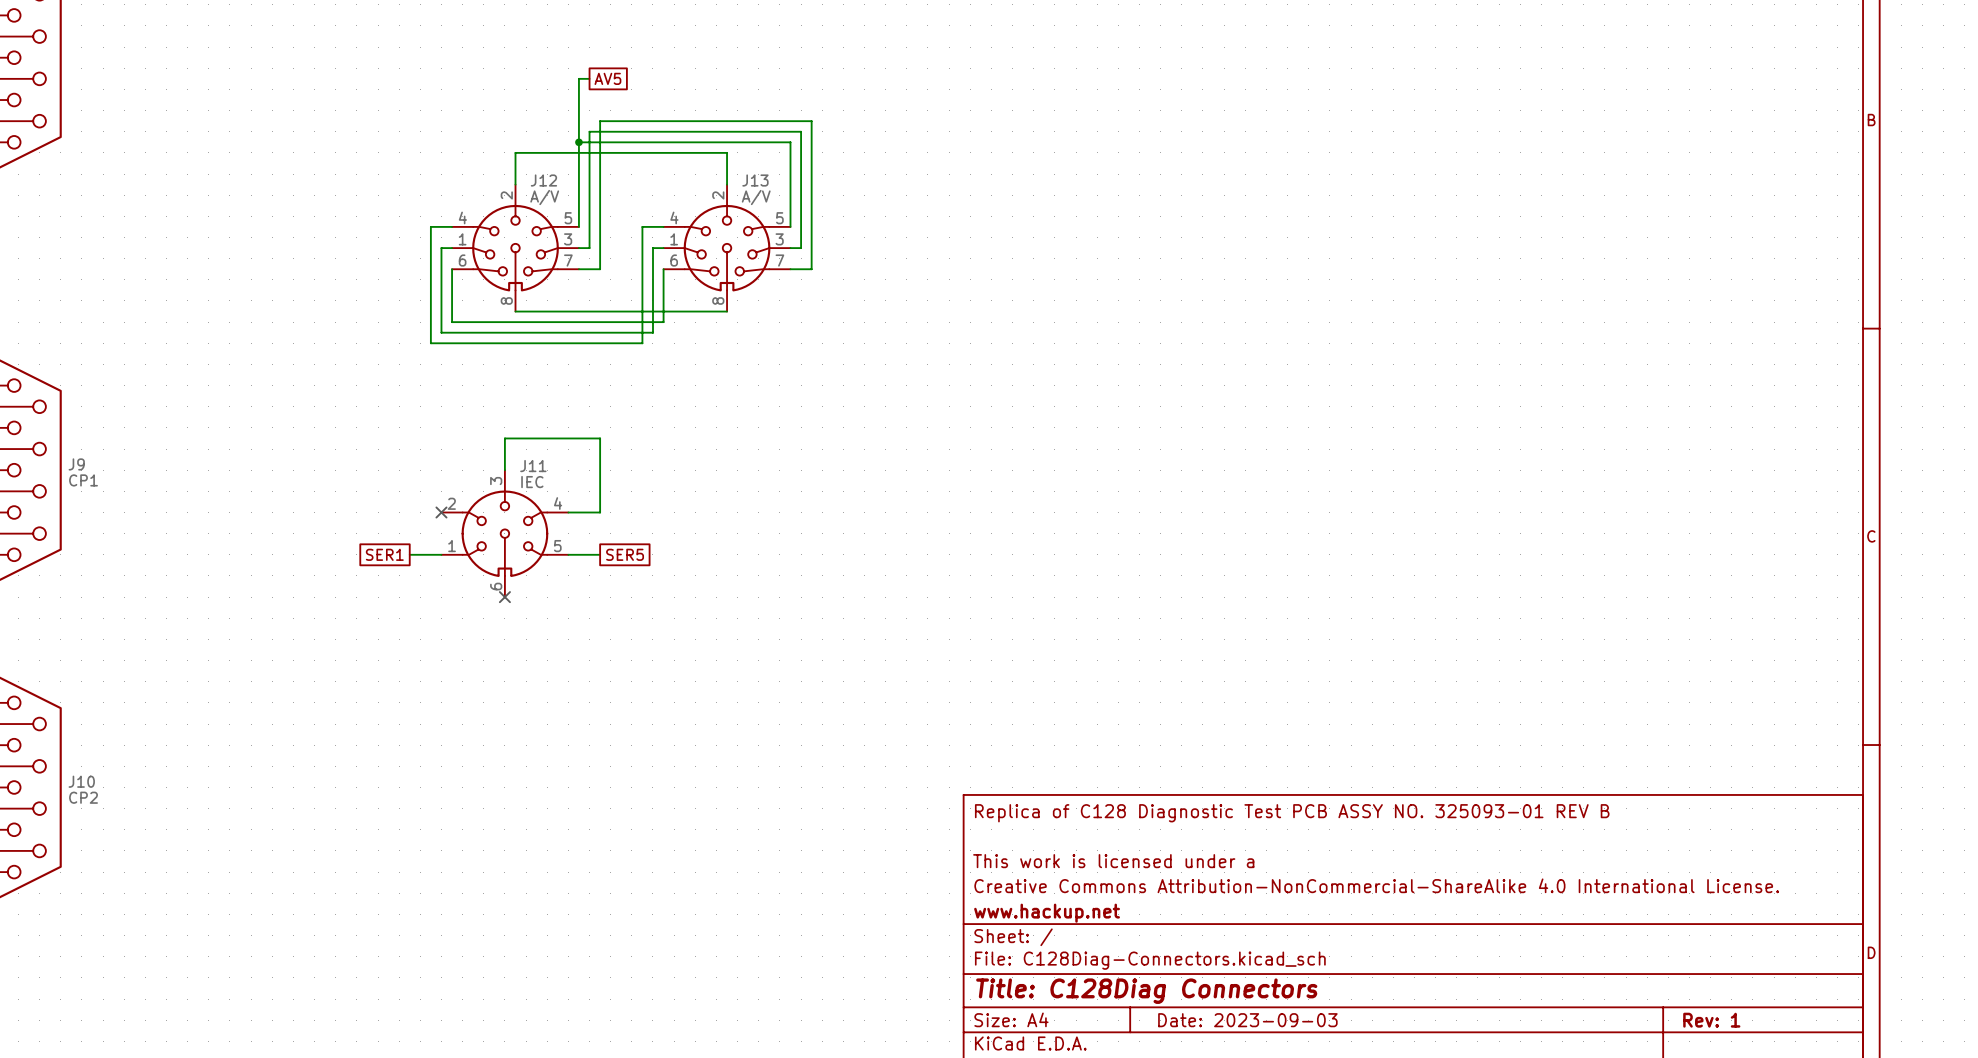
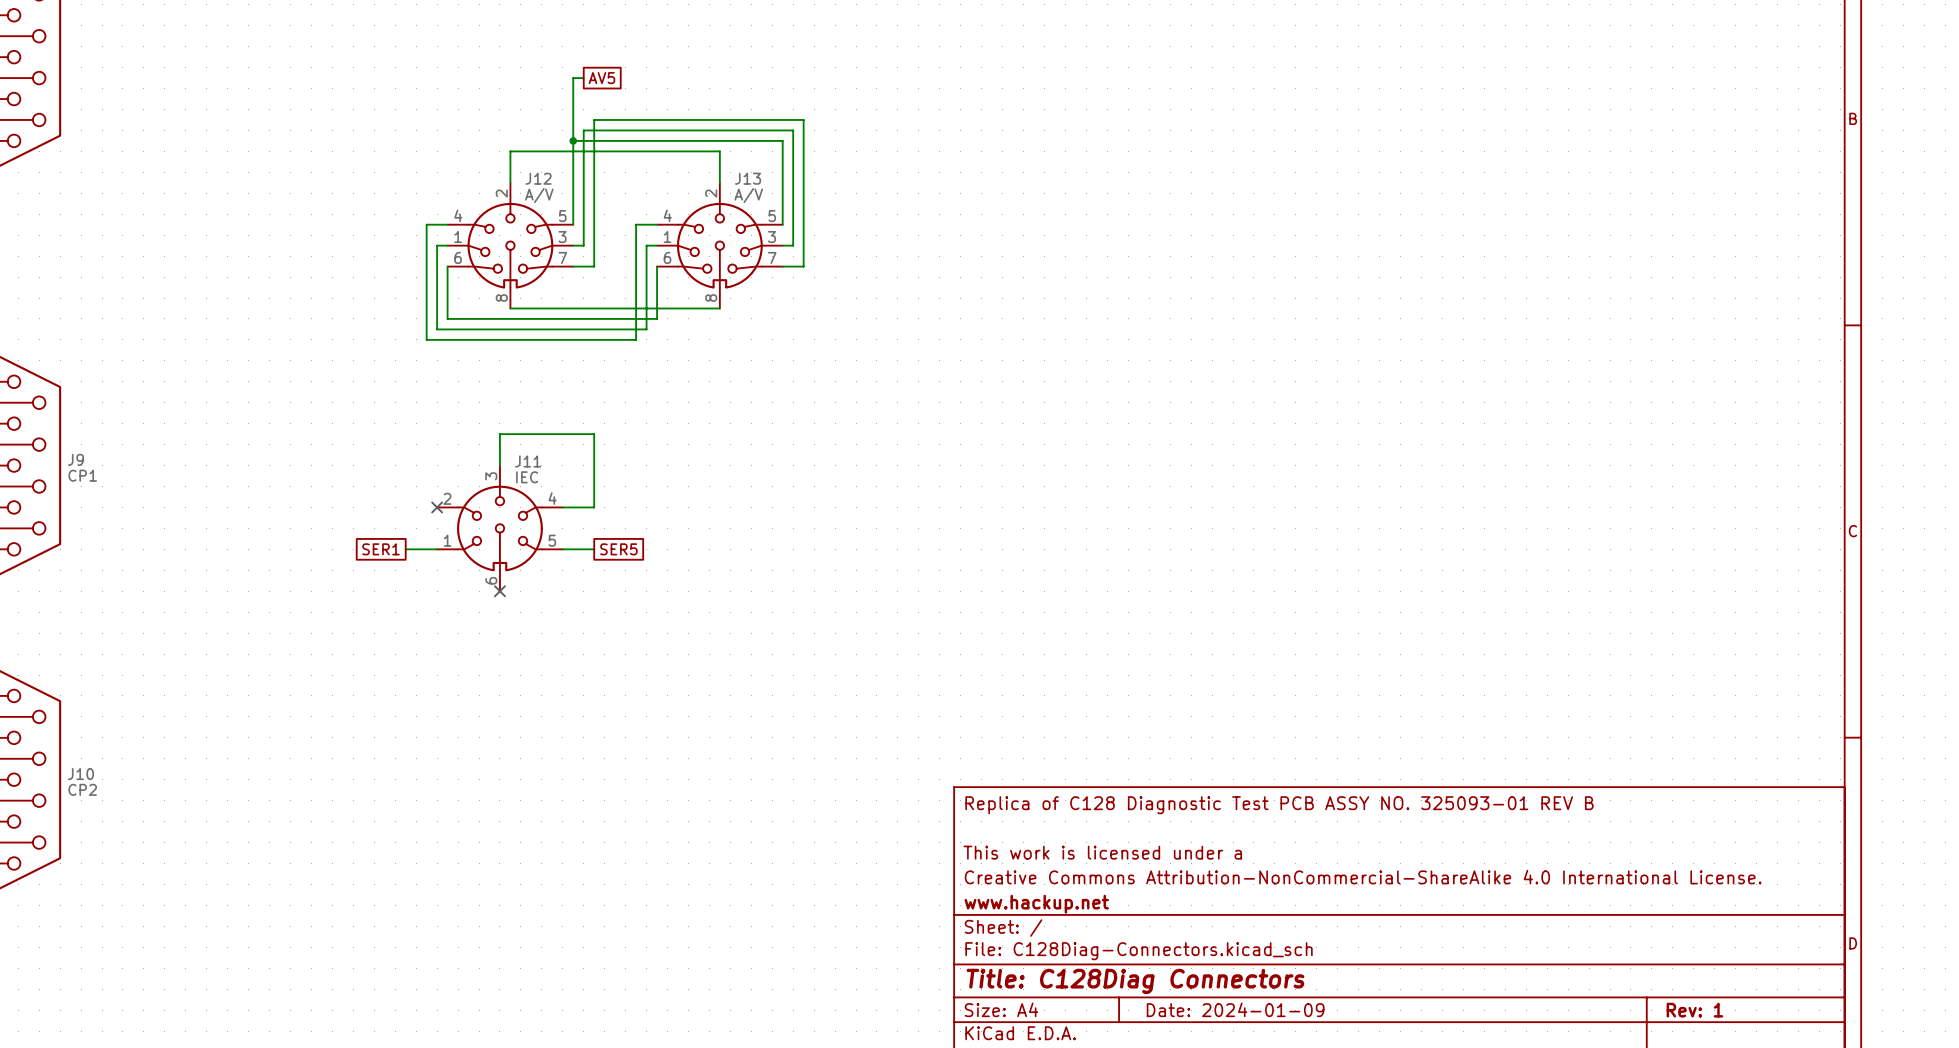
title block: Date: 2023-09-03 (1247, 1020) -> Date: 2024-01-09 (1235, 1009)

